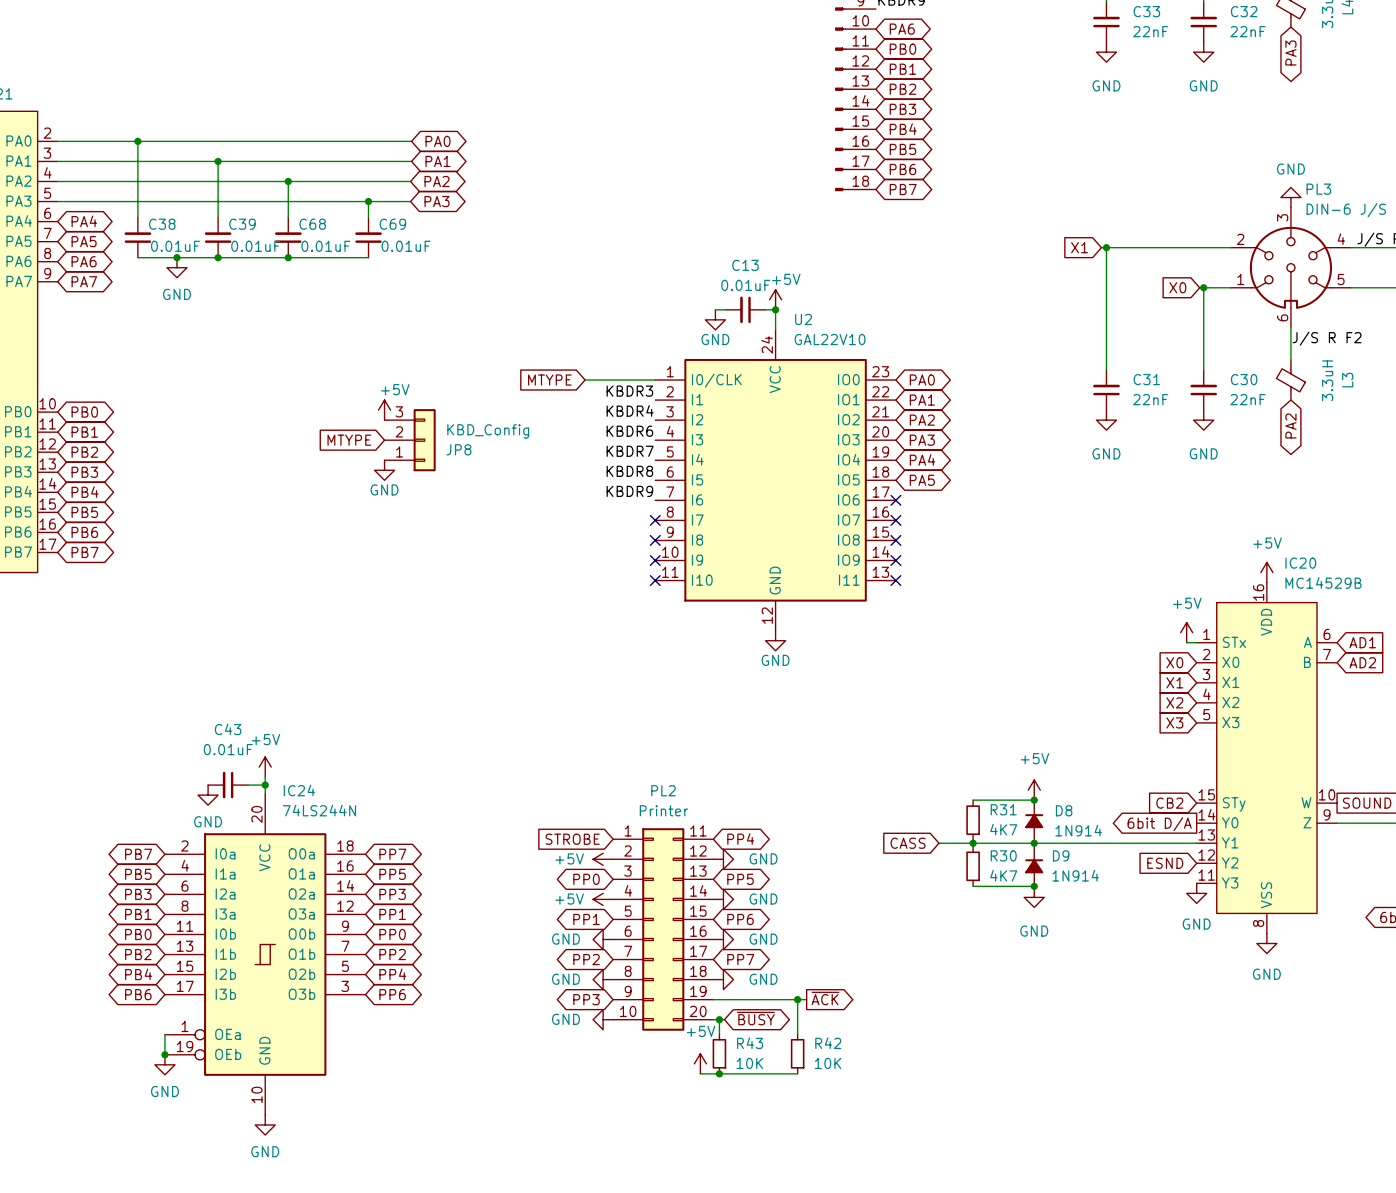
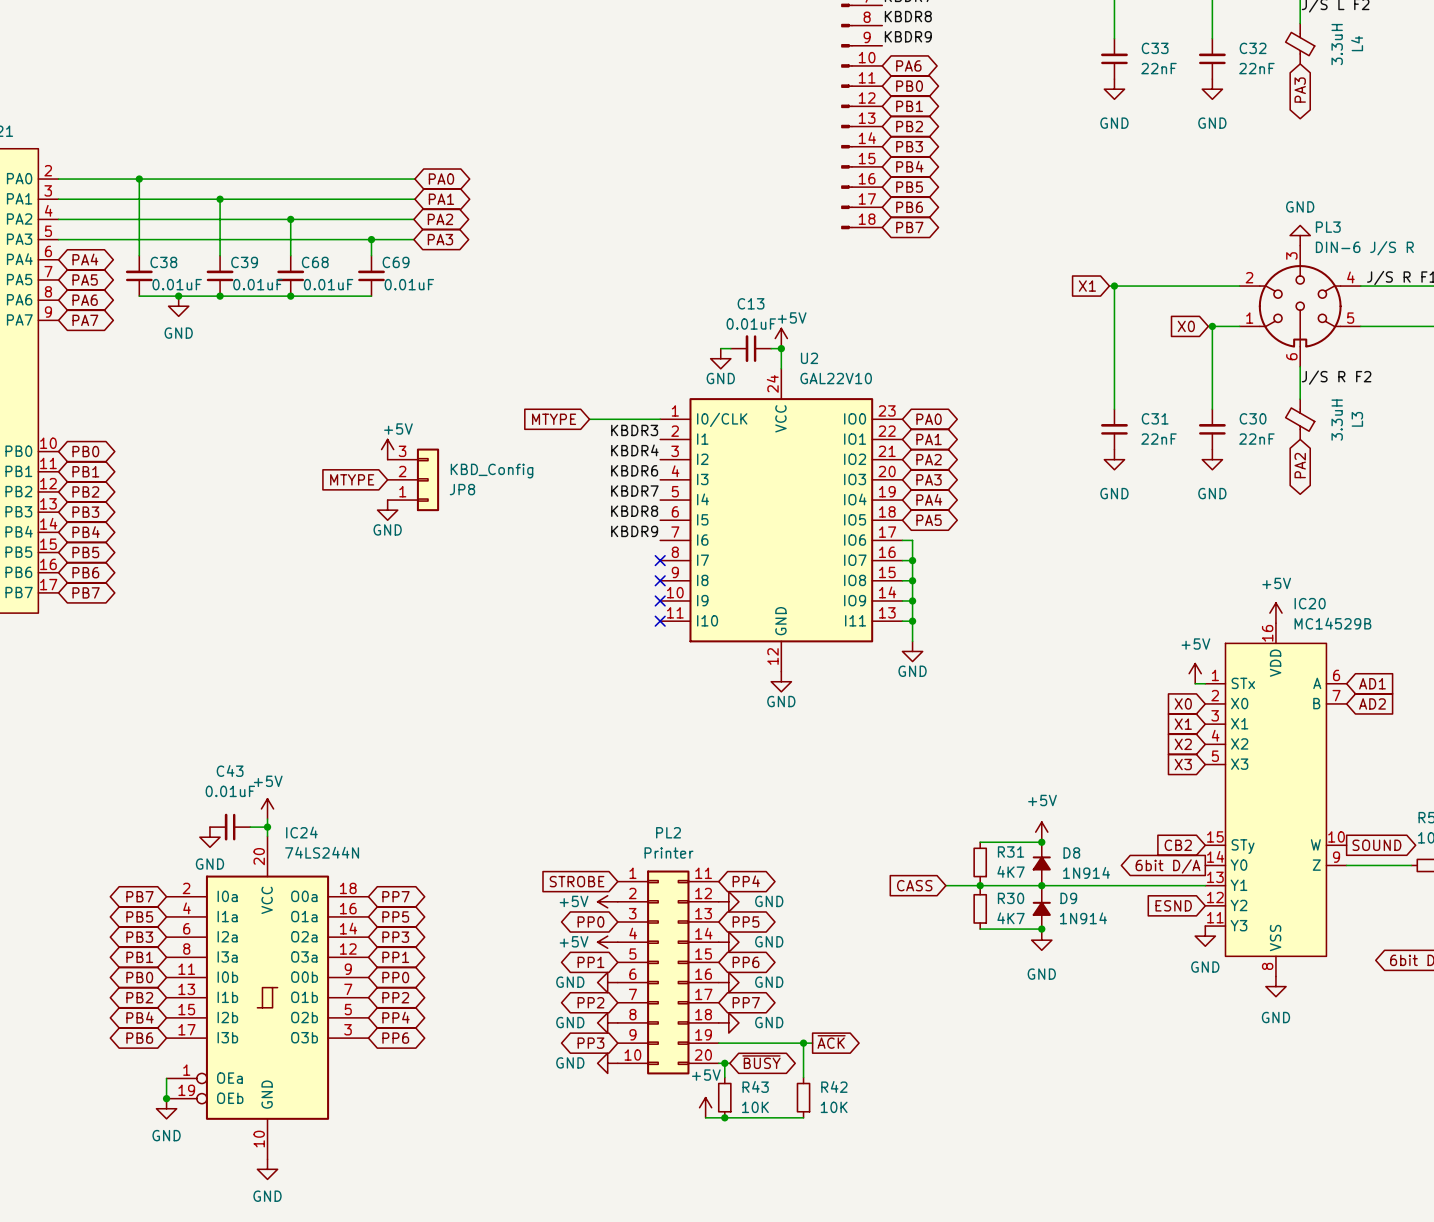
wire: none -> (902, 540) (912, 540) (912, 641)
no-connect mark: (895, 500) -> none
wire: none -> (902, 560) (912, 560)
no-connect mark: (895, 520) -> none
junction: none -> (912, 560)
wire: none -> (902, 580) (912, 580)
no-connect mark: (895, 540) -> none
junction: none -> (912, 580)
wire: none -> (902, 600) (912, 600)
no-connect mark: (895, 560) -> none
junction: none -> (912, 600)
wire: none -> (902, 621) (912, 621)
no-connect mark: (895, 580) -> none
junction: none -> (912, 621)
power symbol: none -> GND (912, 651)

